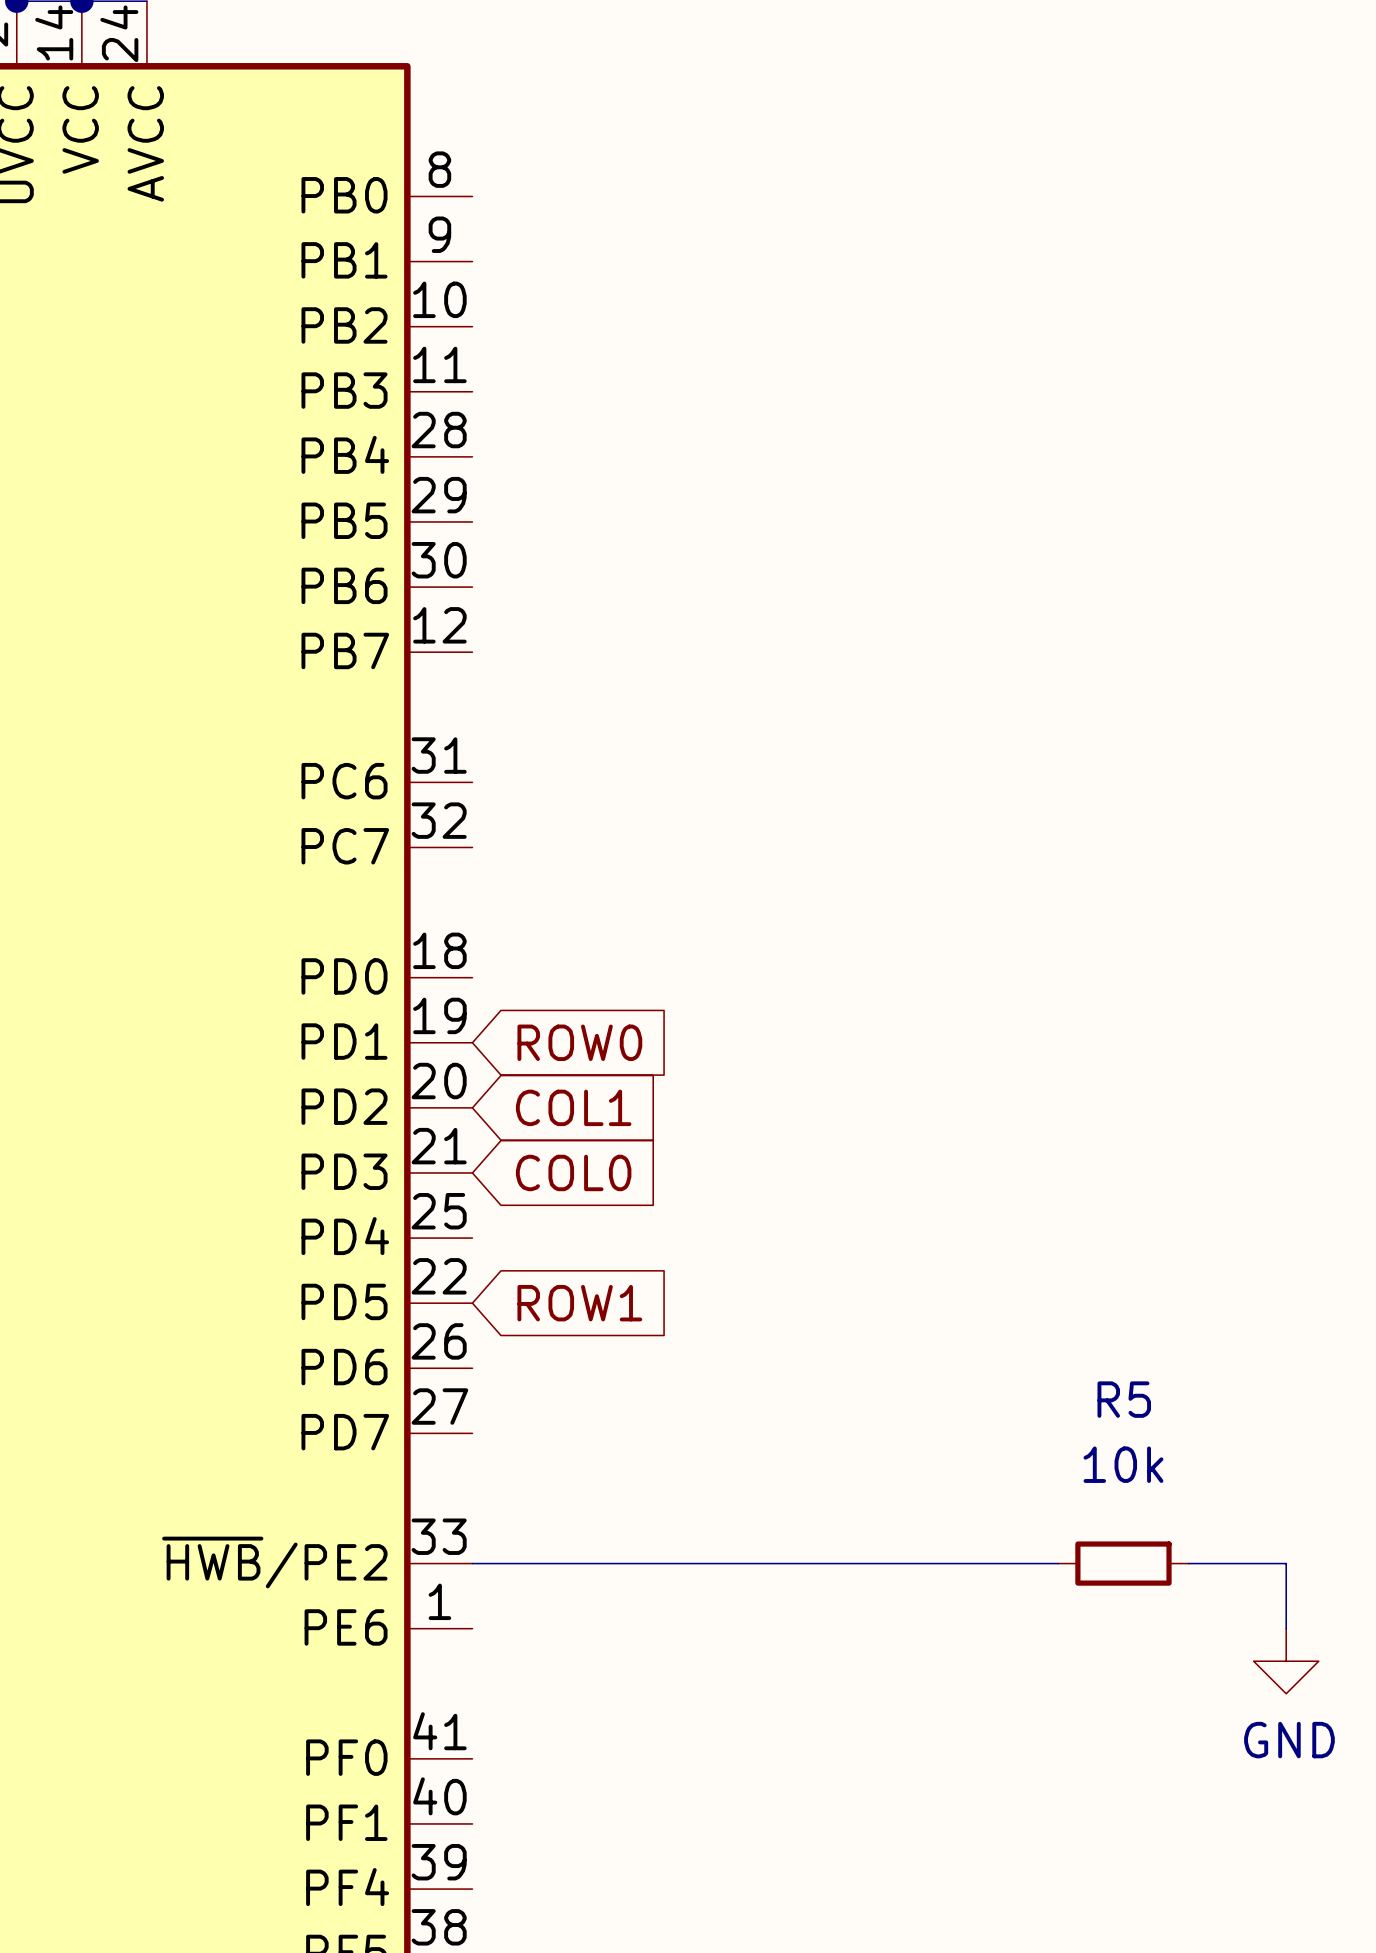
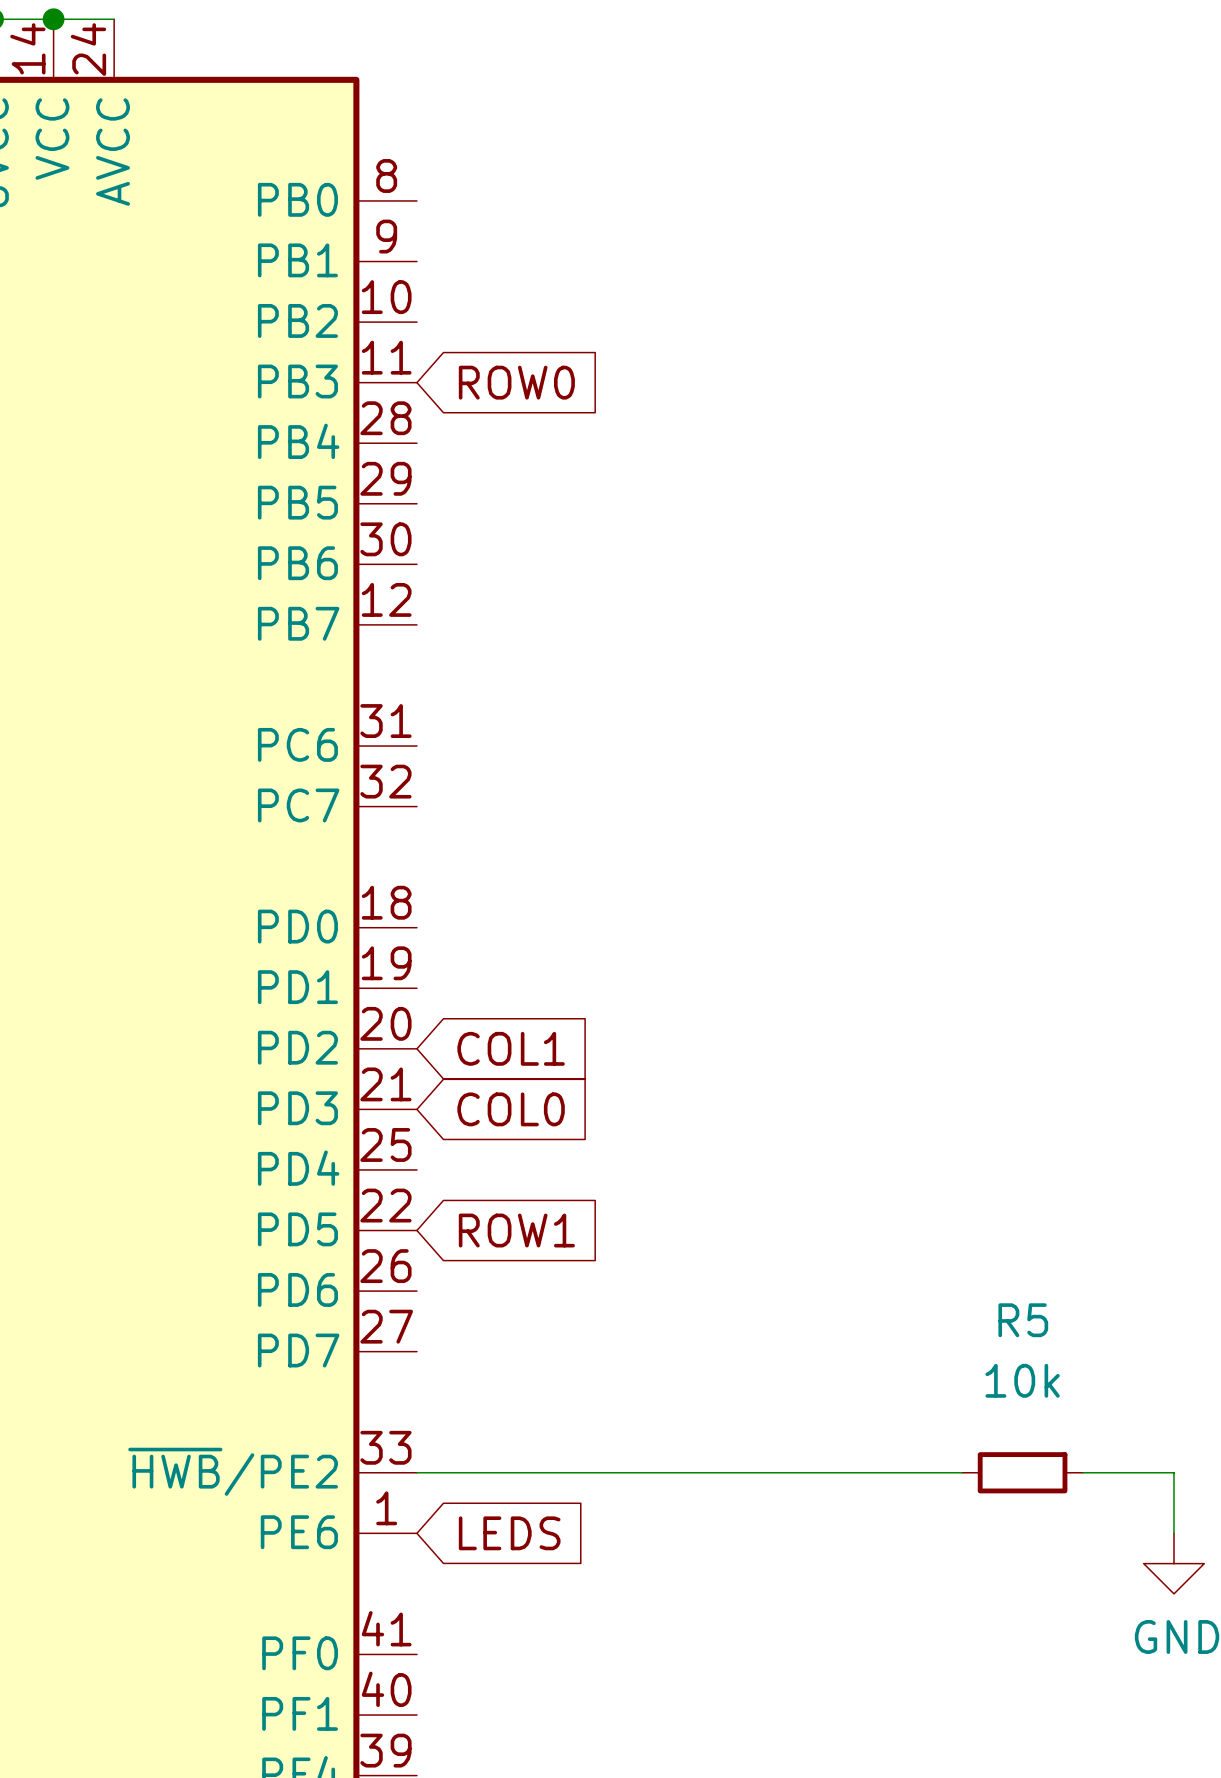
global label: none -> ROW0 (516, 382)
global label: ROW0 (579, 1042) -> none
global label: none -> LEDS (509, 1533)

